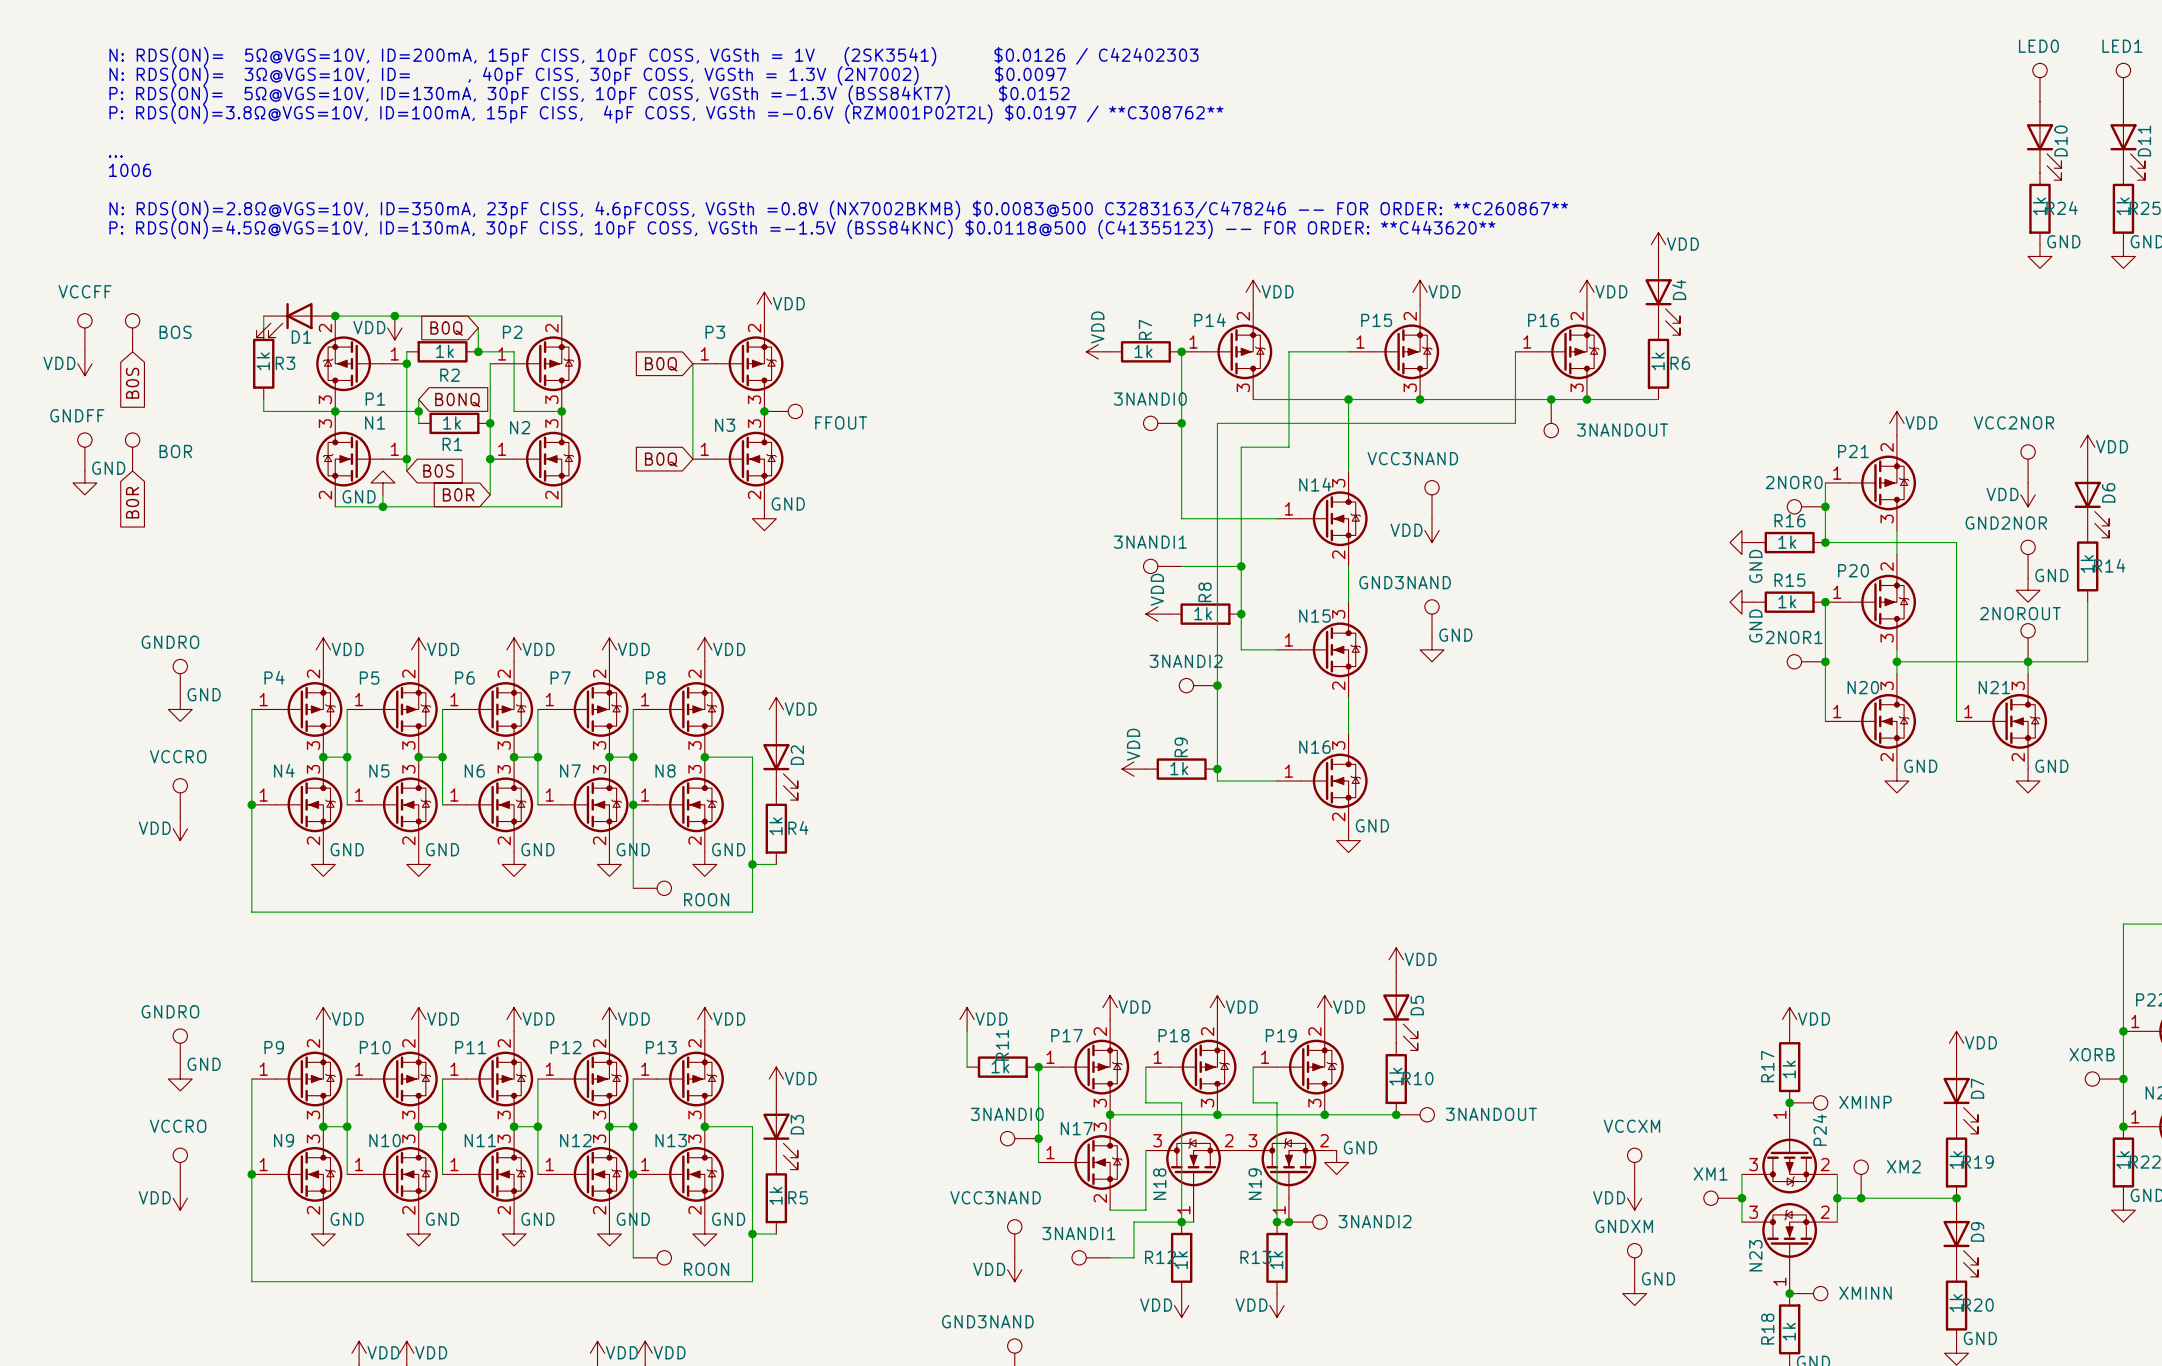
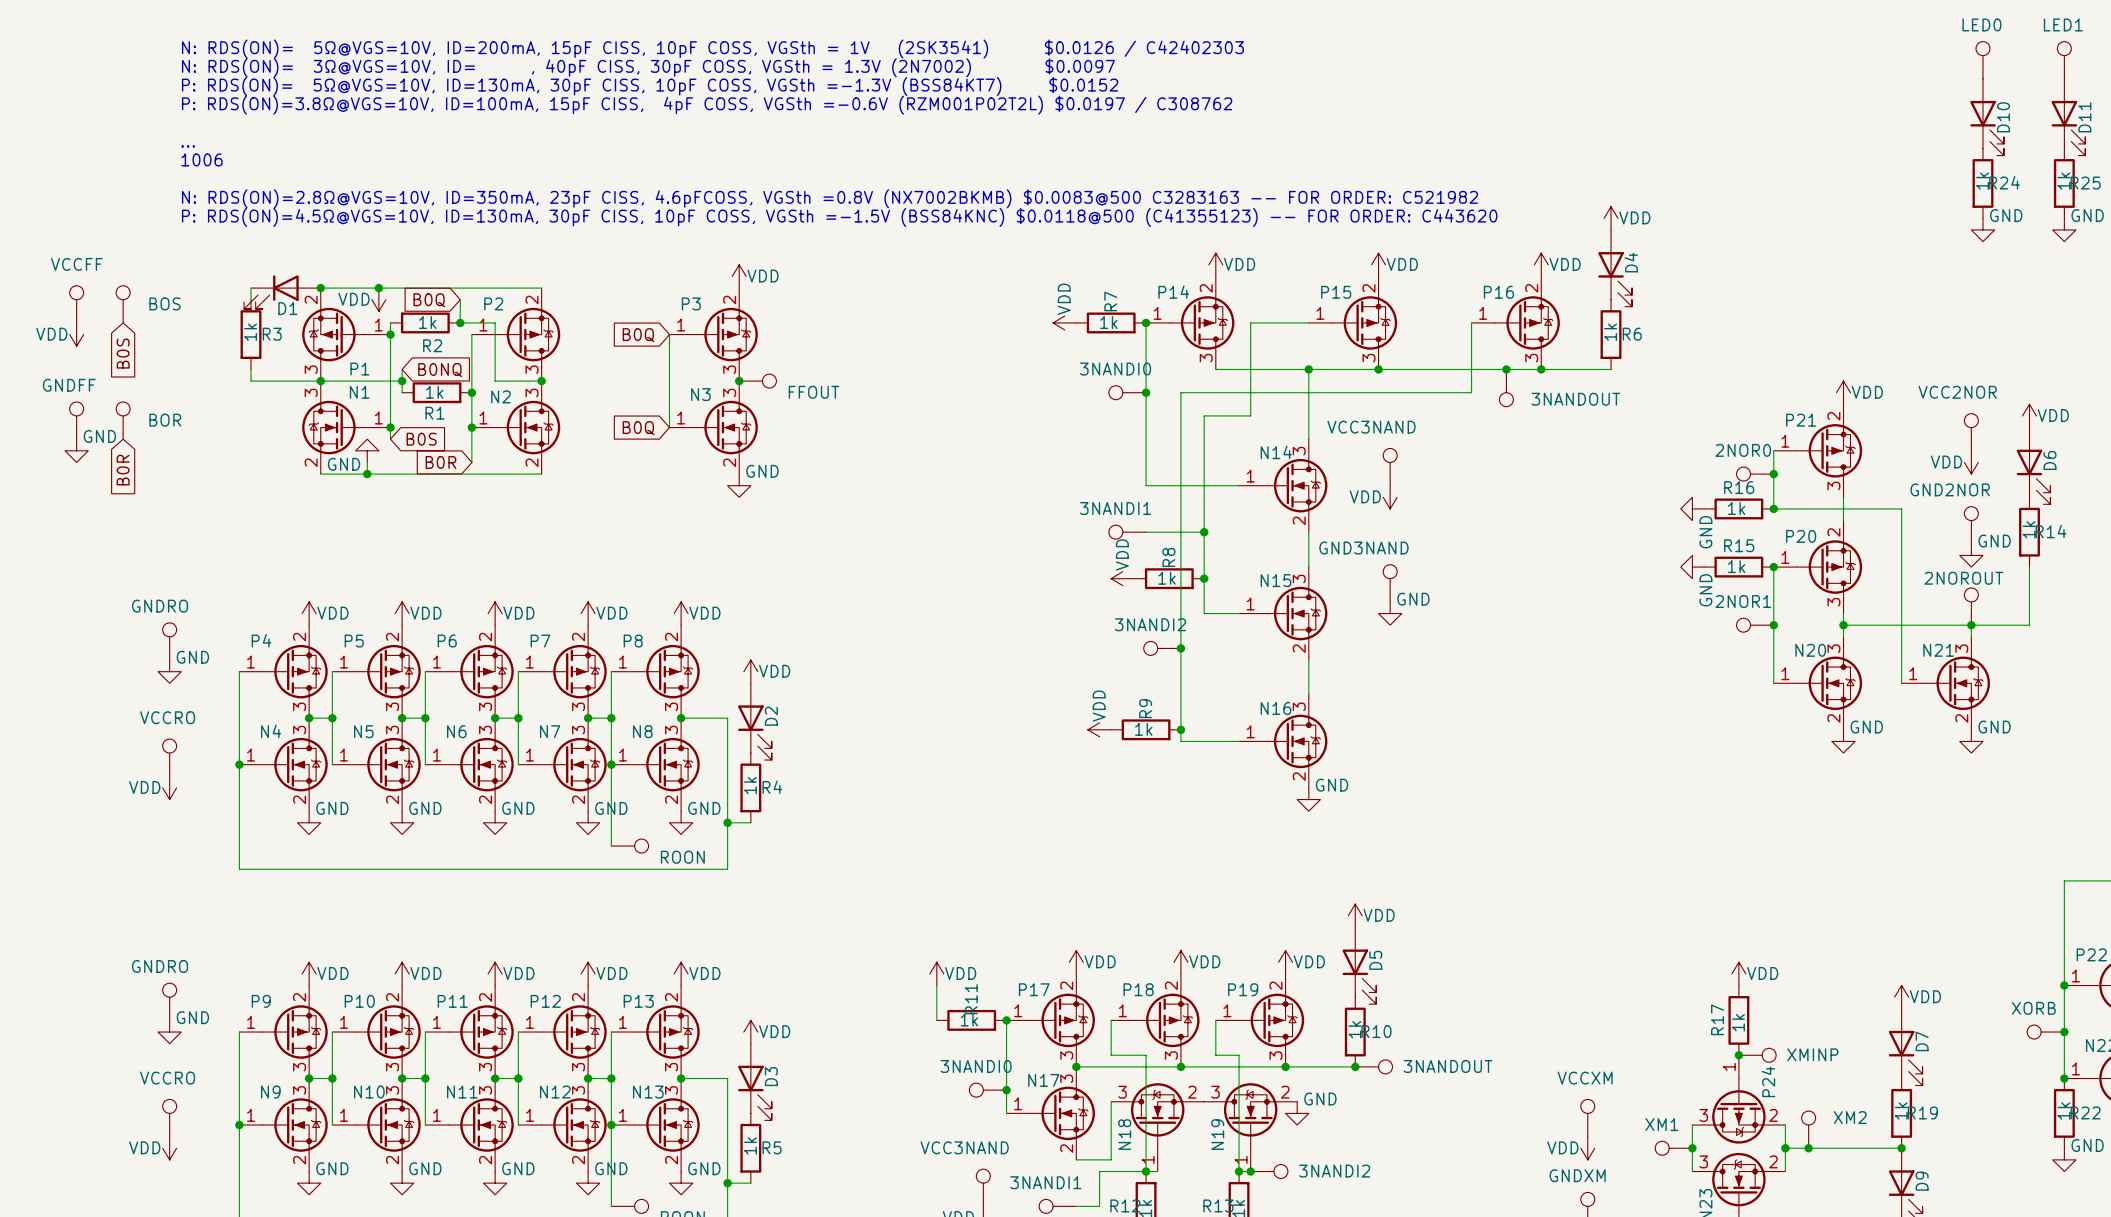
text position: N: RDS(ON)= 5Ω@VGS=10V, ID=200mA, 15pF CISS, 10pF COSS, VGSth = 1V (2SK3541) $0.0126 / C42402303 (653, 56) -> N: RDS(ON)= 5Ω@VGS=10V, ID=200mA, 15pF CISS, 10pF COSS, VGSth = 1V (2SK3541) $0.0126 / C42402303 (712, 49)
text position: N: RDS(ON)= 3Ω@VGS=10V, ID= , 40pF CISS, 30pF COSS, VGSth = 1.3V (2N7002) $0.0097 (587, 75) -> N: RDS(ON)= 3Ω@VGS=10V, ID= , 40pF CISS, 30pF COSS, VGSth = 1.3V (2N7002) $0.0097 (648, 67)
text position: P: RDS(ON)= 5Ω@VGS=10V, ID=130mA, 30pF CISS, 10pF COSS, VGSth =-1.3V (BSS84KT7) $0.0152 (589, 94) -> P: RDS(ON)= 5Ω@VGS=10V, ID=130mA, 30pF CISS, 10pF COSS, VGSth =-1.3V (BSS84KT7) $0.0152 (650, 86)
text: P: RDS(ON)=3.8Ω@VGS=10V, ID=100mA, 15pF CISS, 4pF COSS, VGSth =-0.6V (RZM001P02T2L) $0.0197 / **C308762** (666, 114) -> P: RDS(ON)=3.8Ω@VGS=10V, ID=100mA, 15pF CISS, 4pF COSS, VGSth =-0.6V (RZM001P02T2L) $0.0197 / C308762 (707, 105)
text position: ... (115, 156) -> ... (188, 146)
text position: 1006 (130, 170) -> 1006 (202, 159)
text: N: RDS(ON)=2.8Ω@VGS=10V, ID=350mA, 23pF CISS, 4.6pFCOSS, VGSth =0.8V (NX7002BKMB) $0.0083@500 C3283163/C478246 -- FOR ORDER: **C260867** (838, 210) -> none
text: none -> N: RDS(ON)=2.8Ω@VGS=10V, ID=350mA, 23pF CISS, 4.6pFCOSS, VGSth =0.8V (NX7002BKMB) $0.0083@500 C3283163 -- FOR ORDER: C521982 (829, 198)
text: P: RDS(ON)=4.5Ω@VGS=10V, ID=130mA, 30pF CISS, 10pF COSS, VGSth =-1.5V (BSS84KNC) $0.0118@500 (C41355123) -- FOR ORDER: **C443620** (802, 229) -> none
text: none -> P: RDS(ON)=4.5Ω@VGS=10V, ID=130mA, 30pF CISS, 10pF COSS, VGSth =-1.5V (BSS84KNC) $0.0118@500 (C41355123) -- FOR ORDER: C443620 (839, 217)

